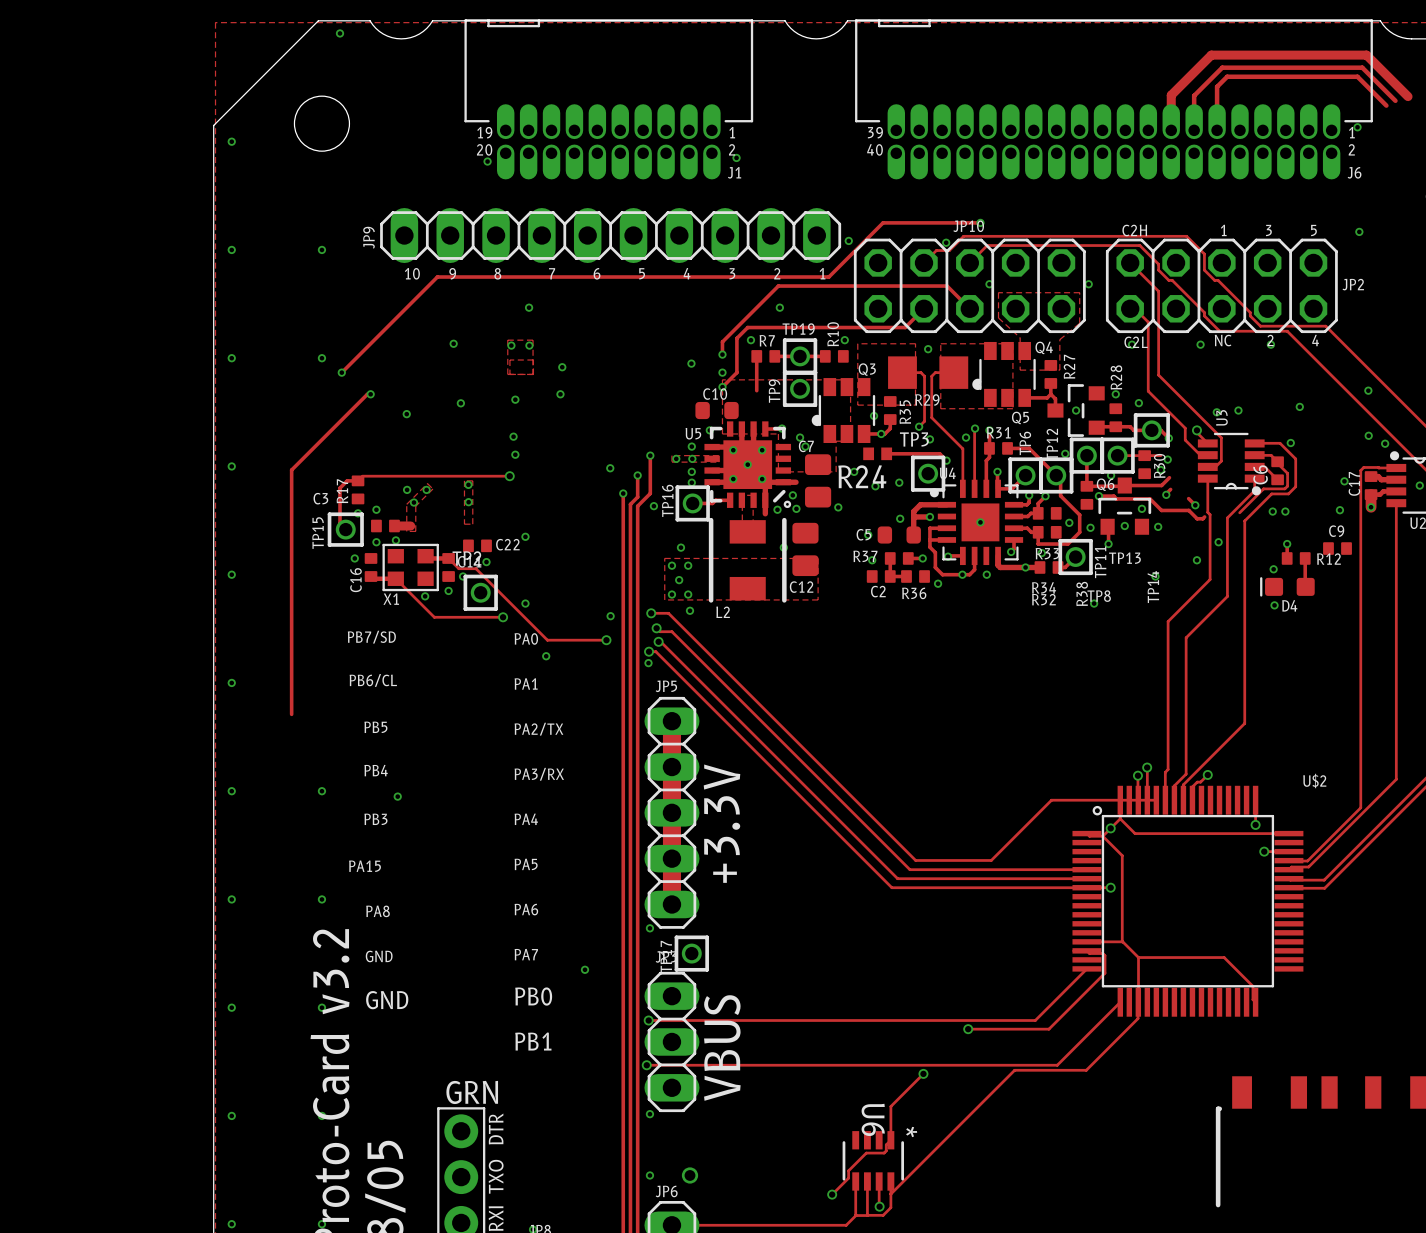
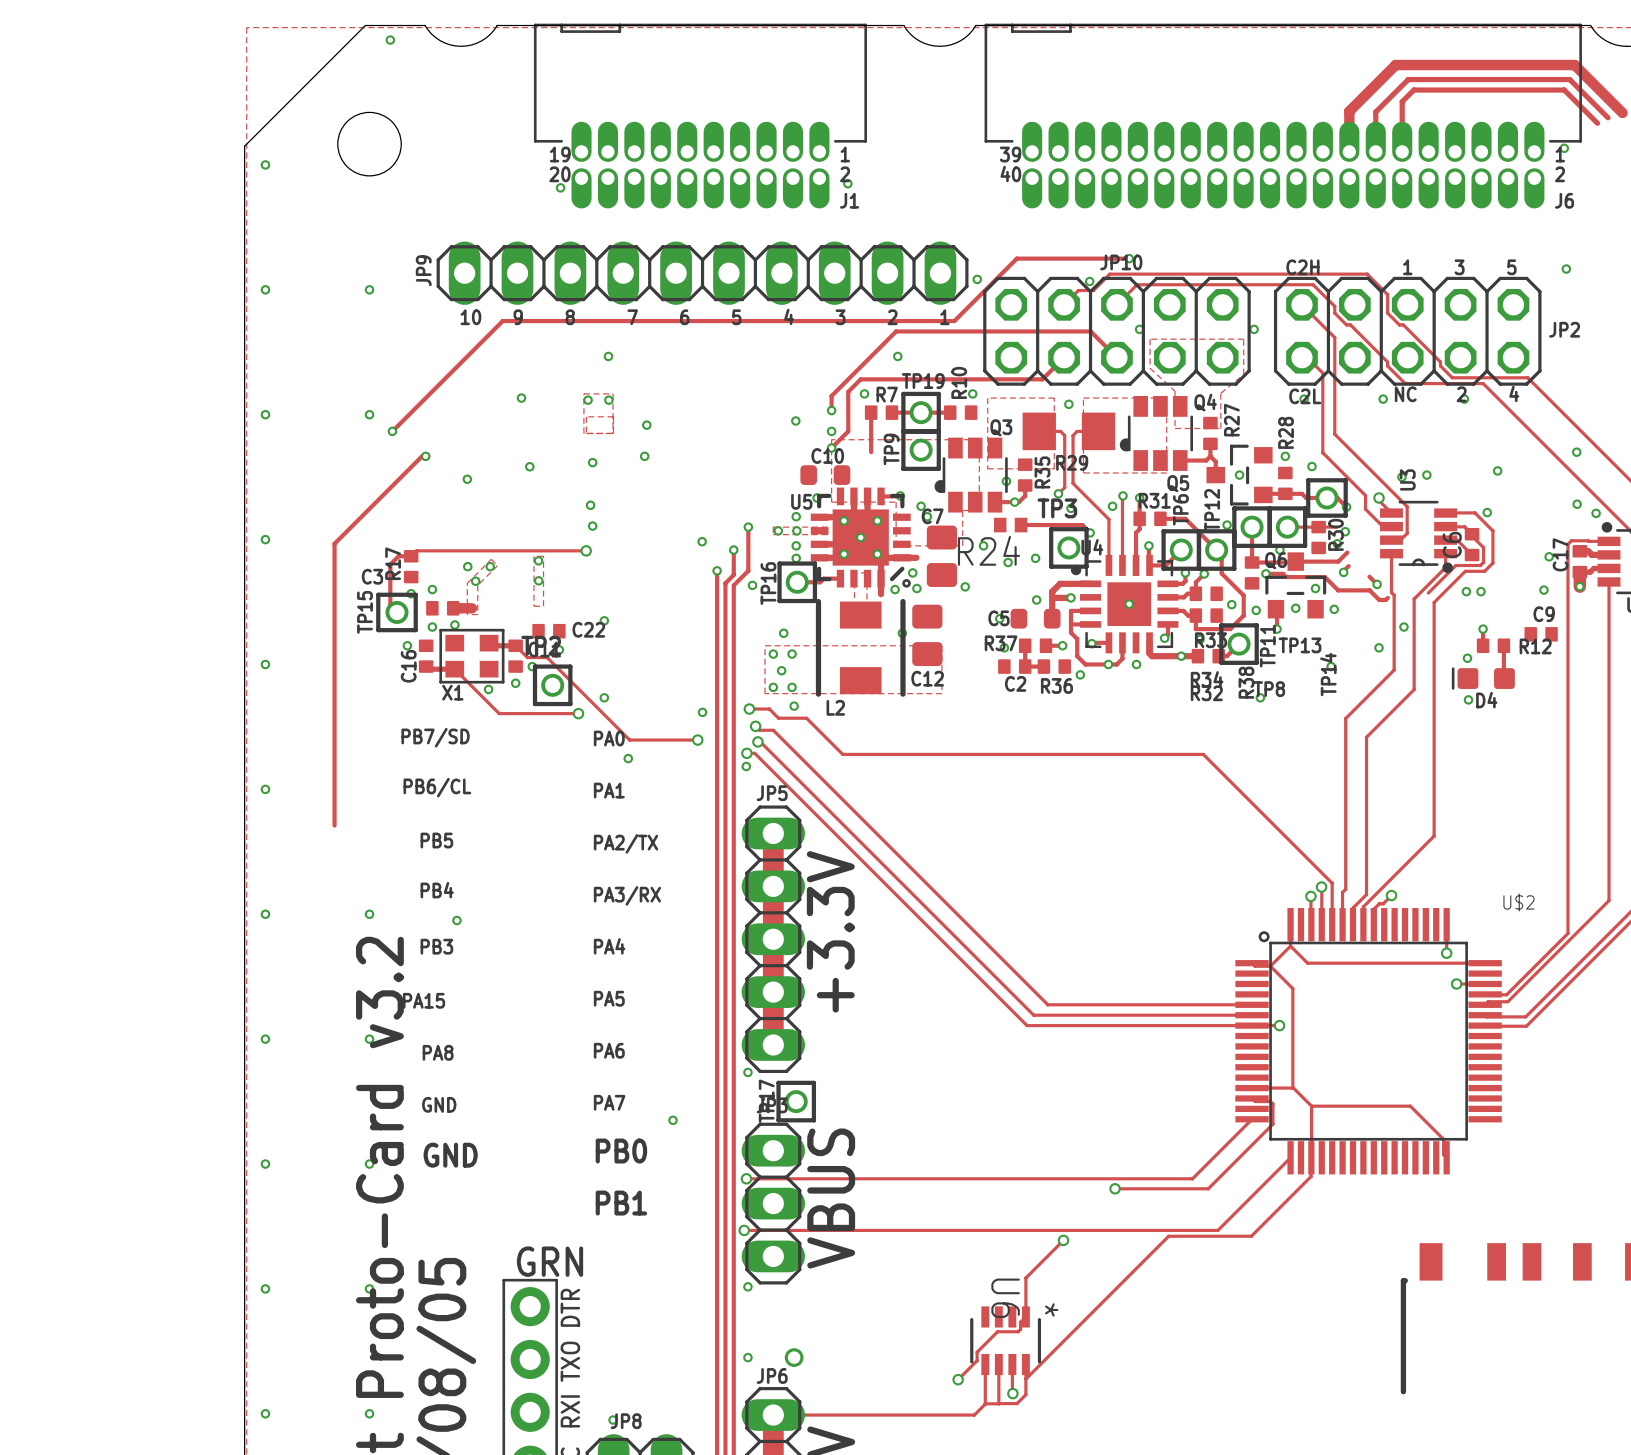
track: (676, 621) (915, 860) (991, 860) (1051, 800) (1156, 800) -> (778, 718) (806, 718) (842, 754) (1203, 754) (1332, 883) (1332, 924)
via: (1110, 828) -> none

